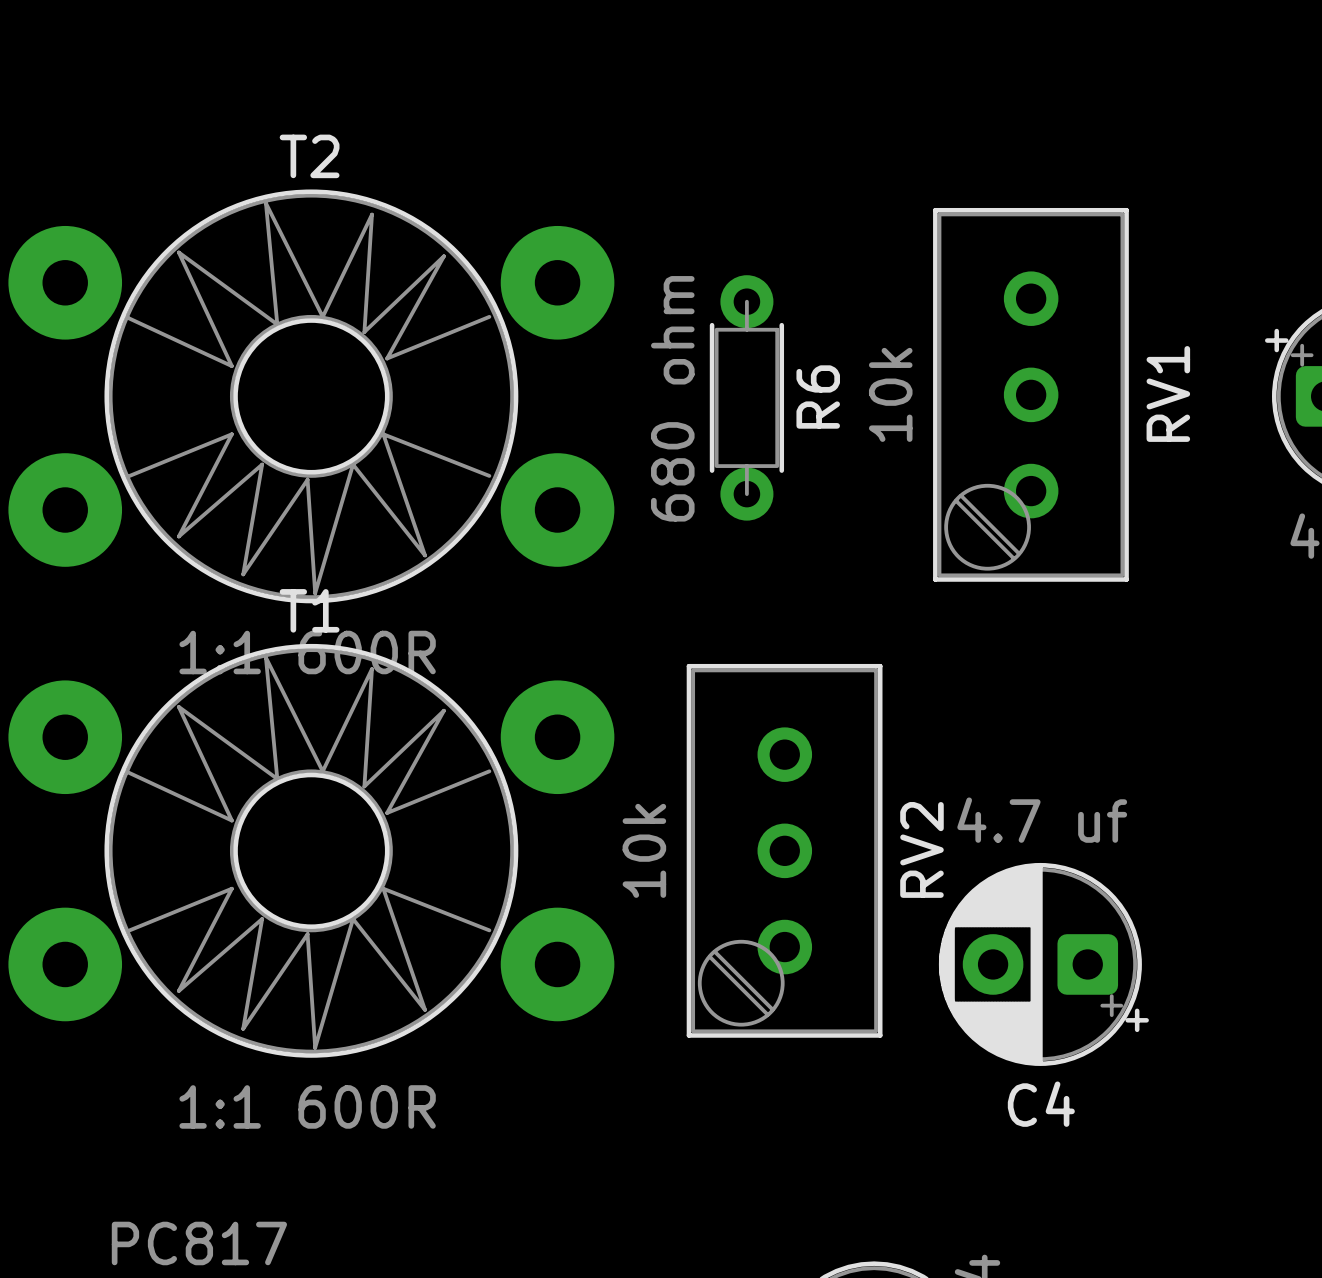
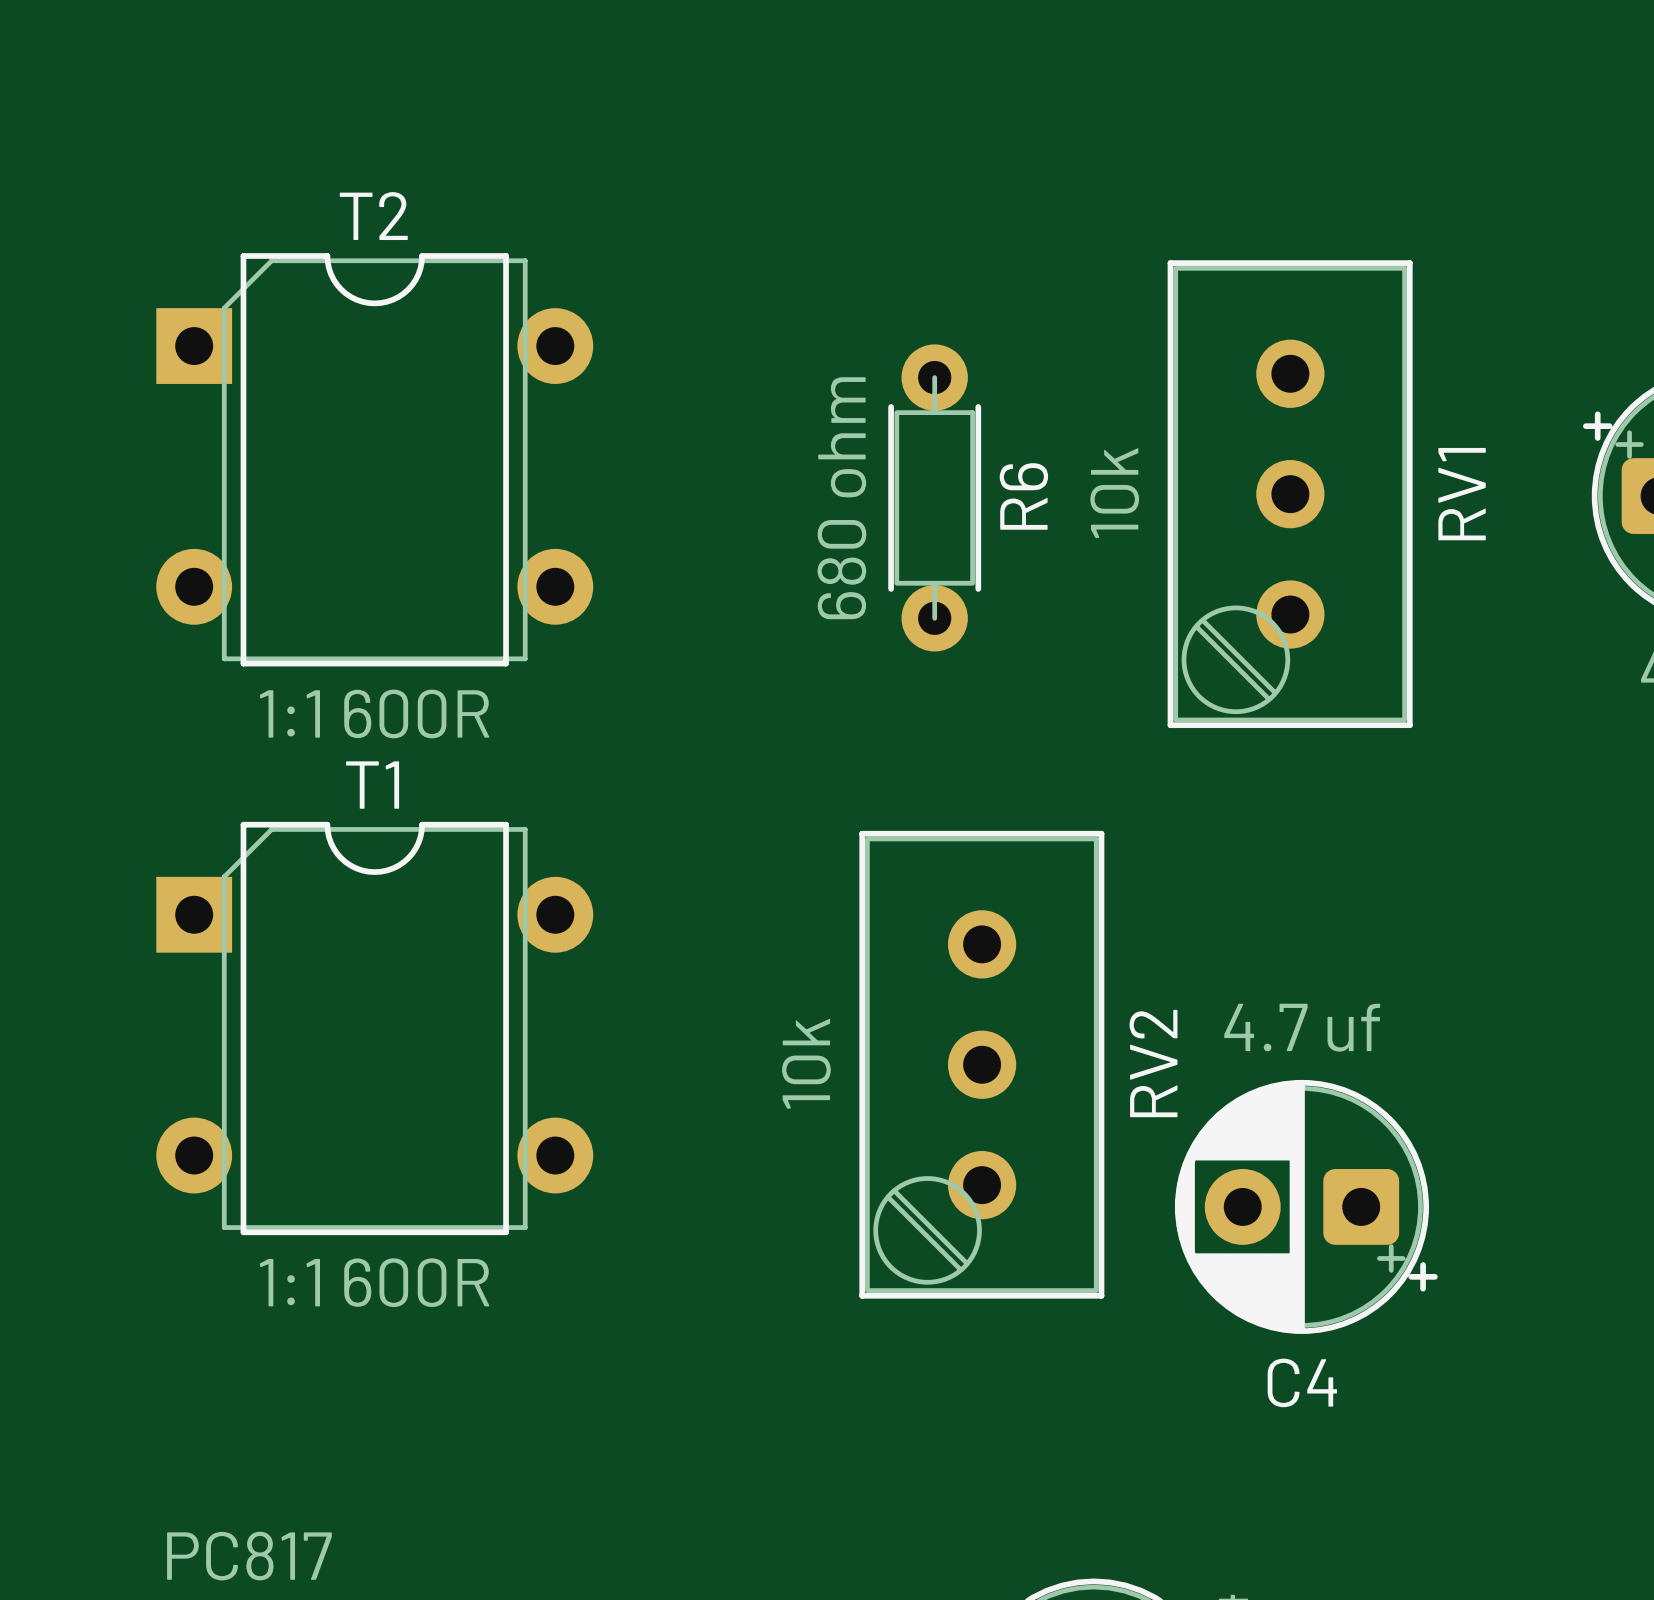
T2 footprint: [8, 189, 615, 604] -> [156, 253, 594, 667]
T1 footprint: [8, 643, 615, 1058] -> [156, 821, 594, 1236]

